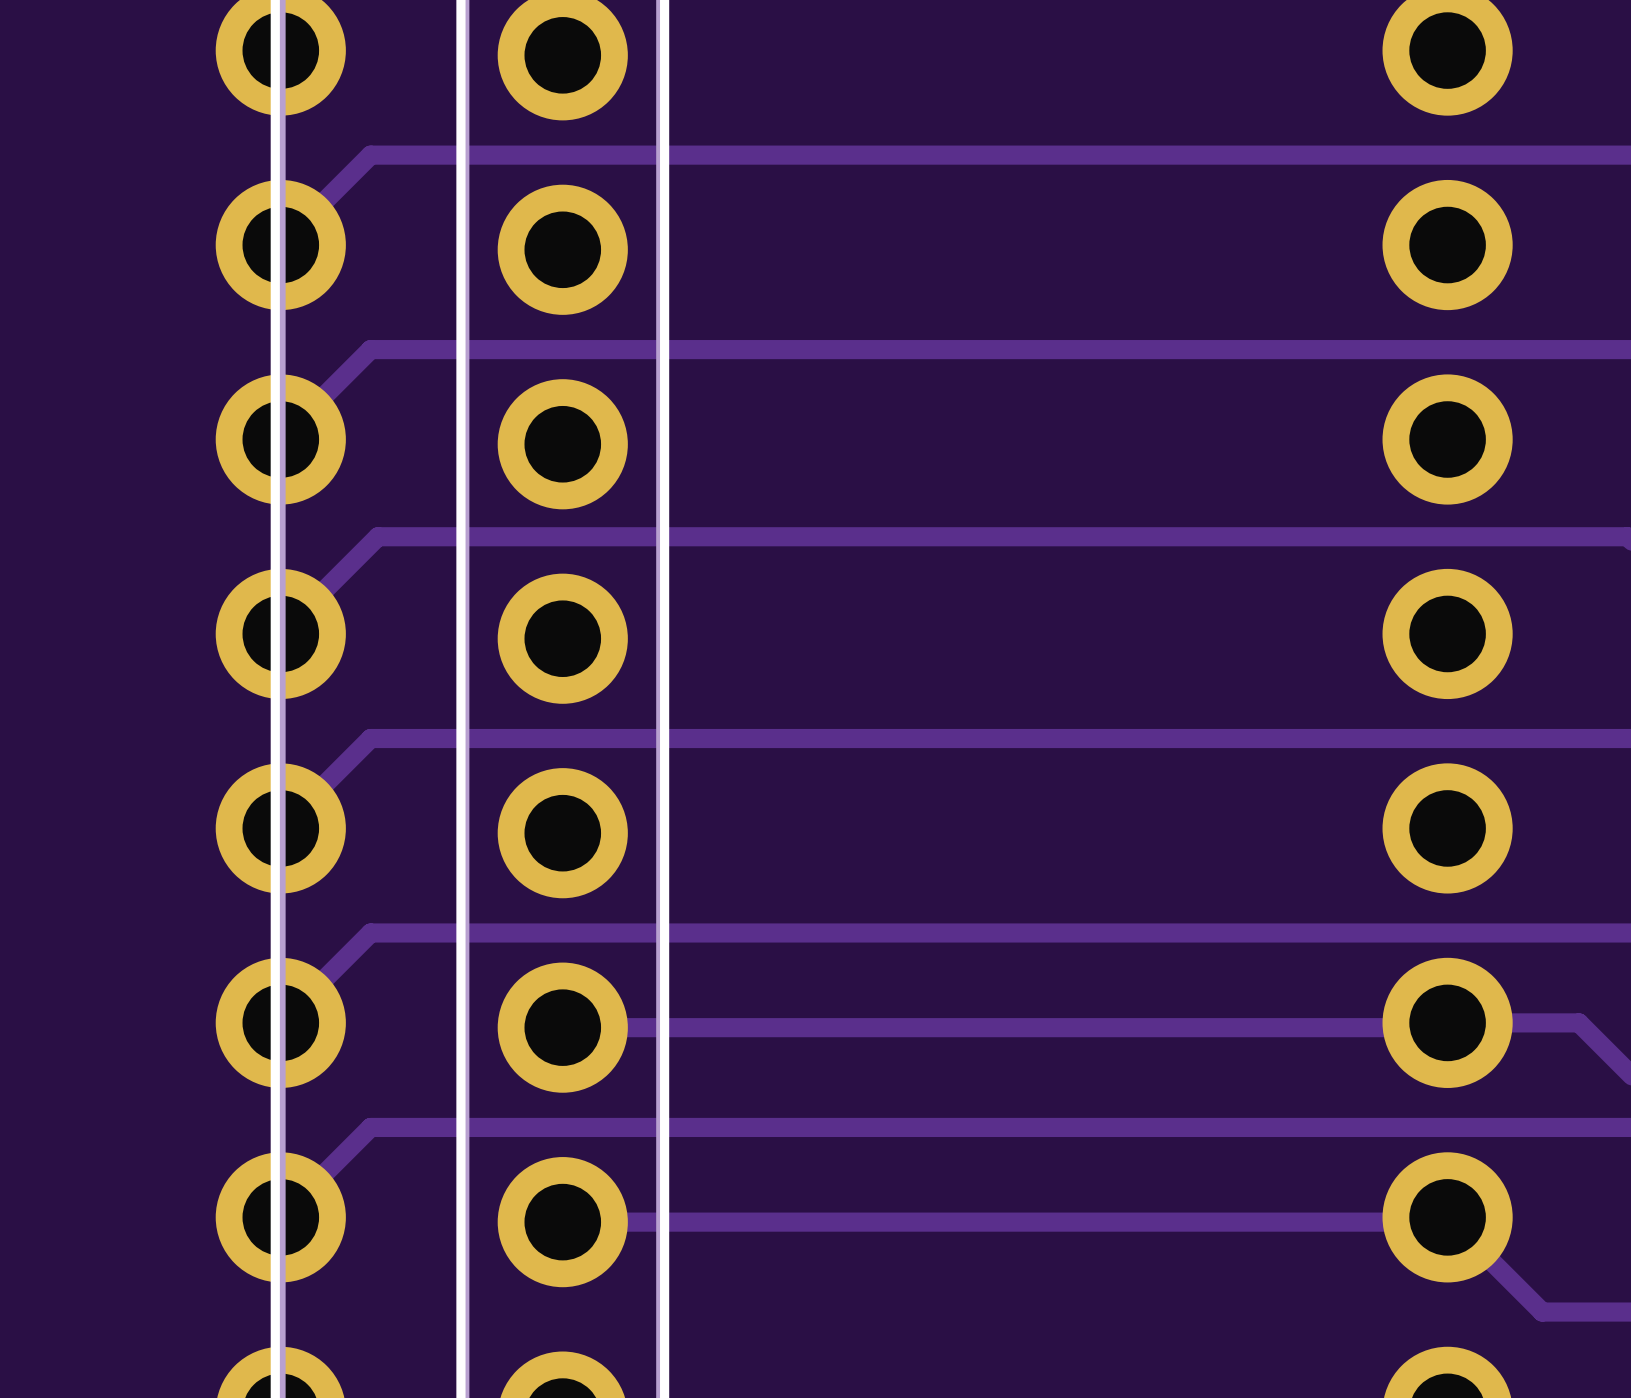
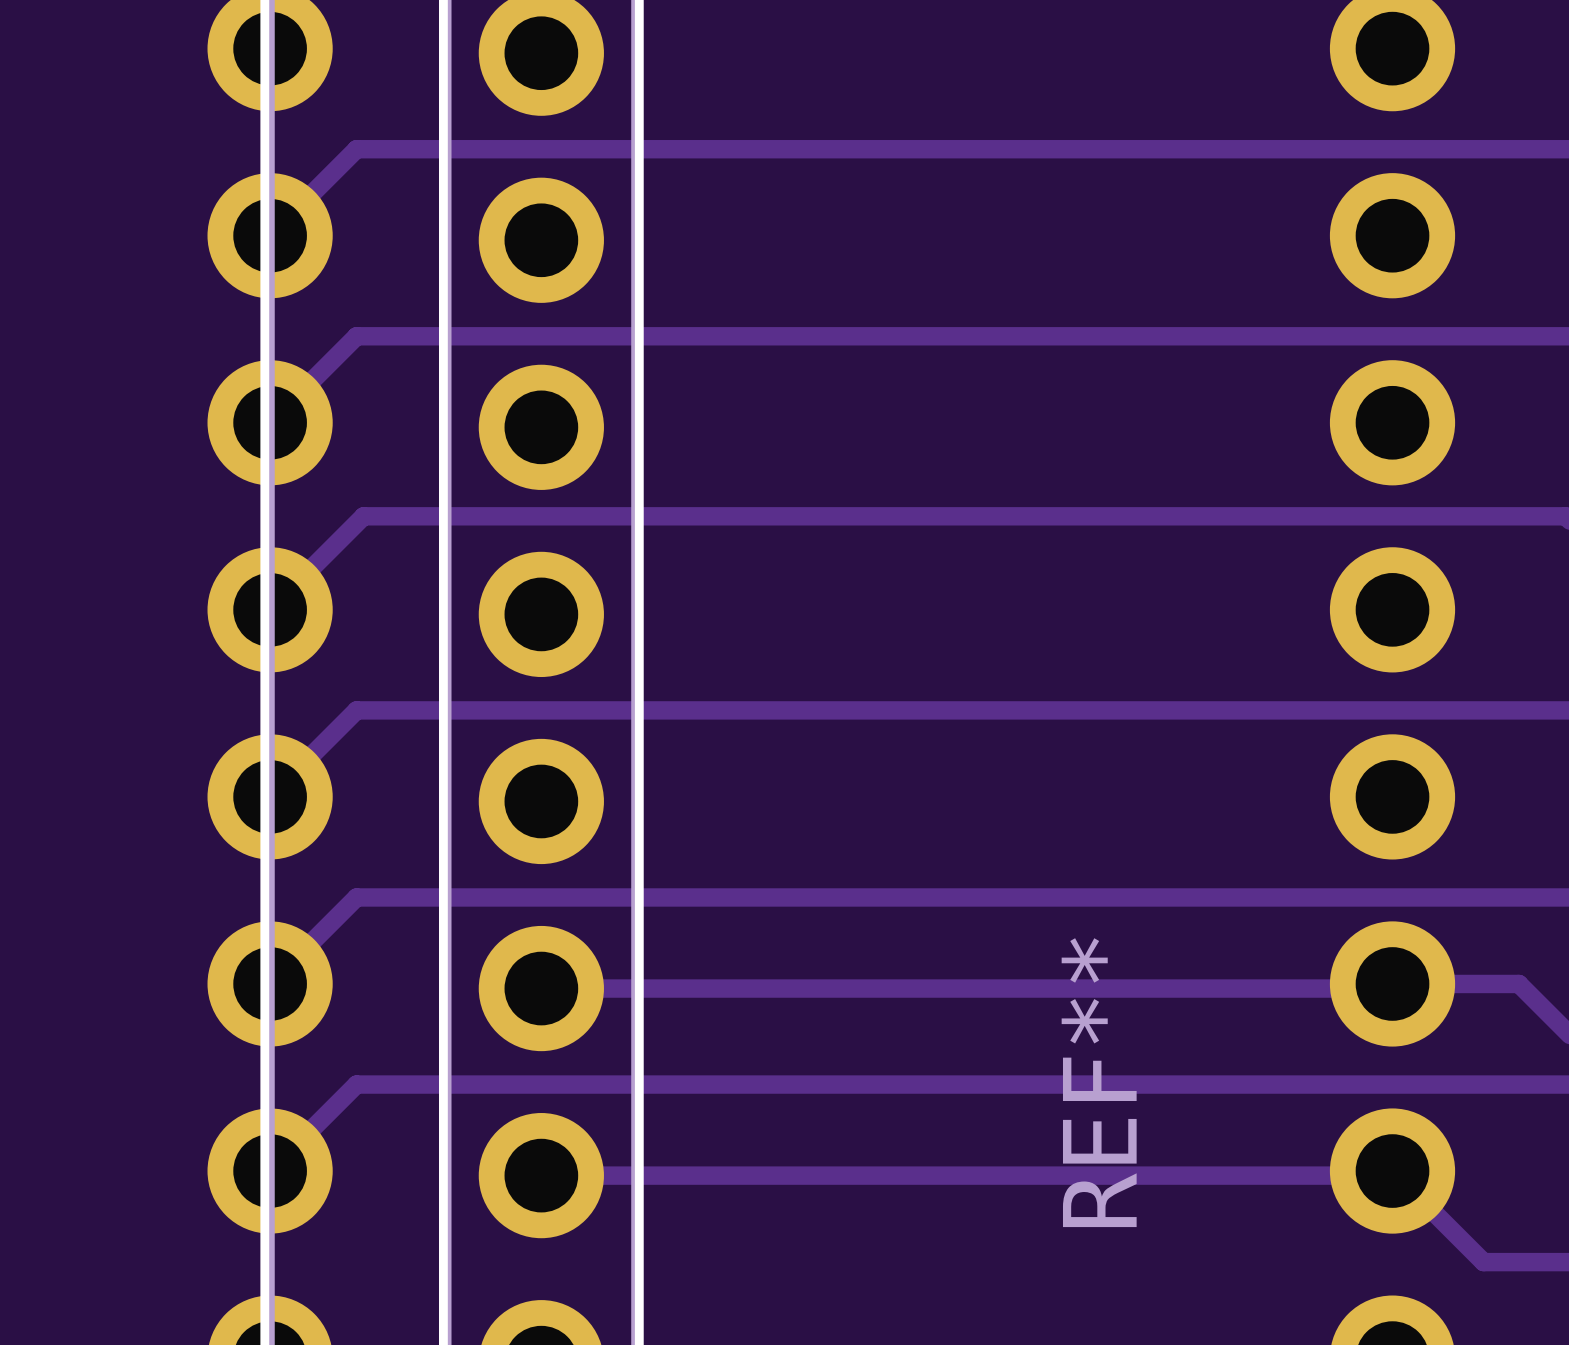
part text: none -> REF** (1099, 1082)

